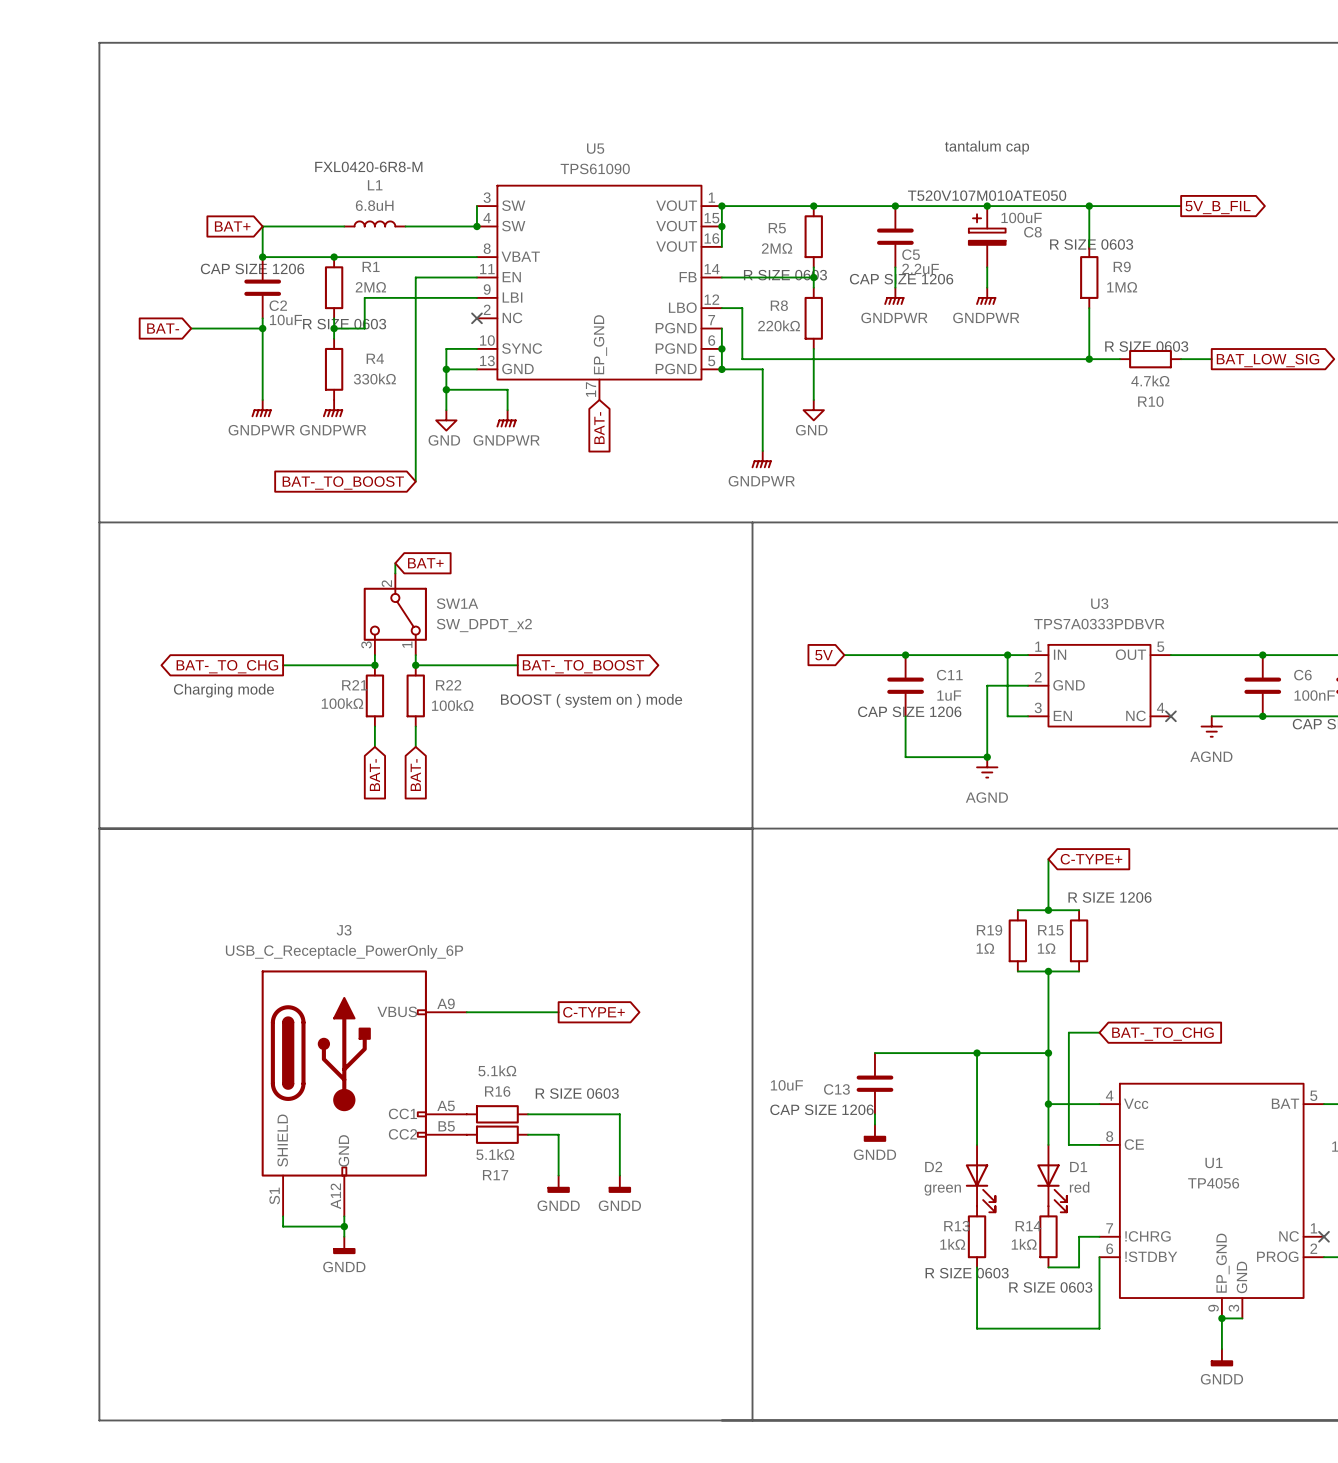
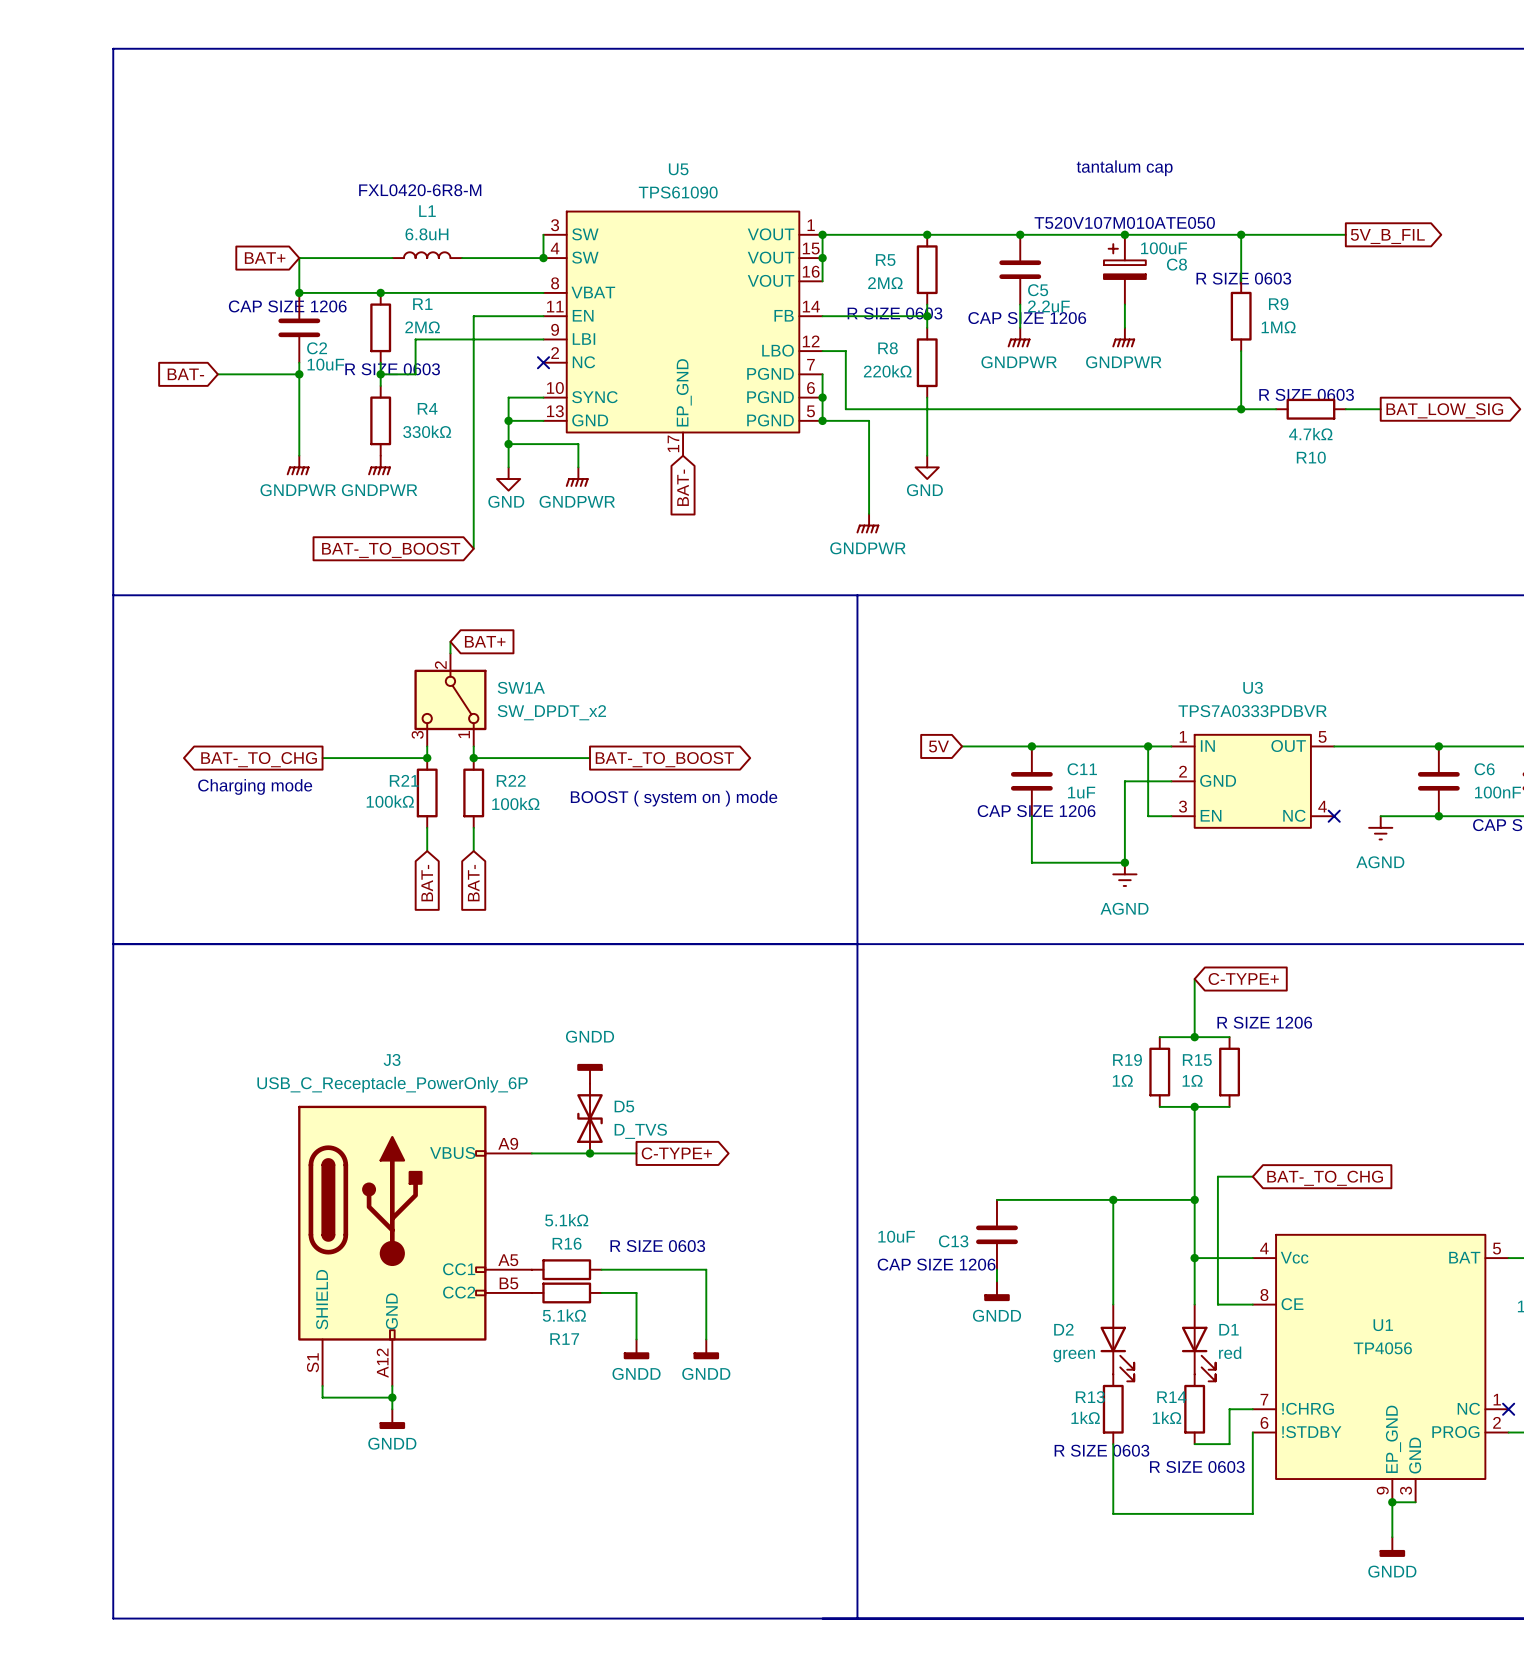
power symbol: none -> GNDD (590, 1073)
D5: none -> D_TVS (590, 1118)
junction: none -> (590, 1153)

